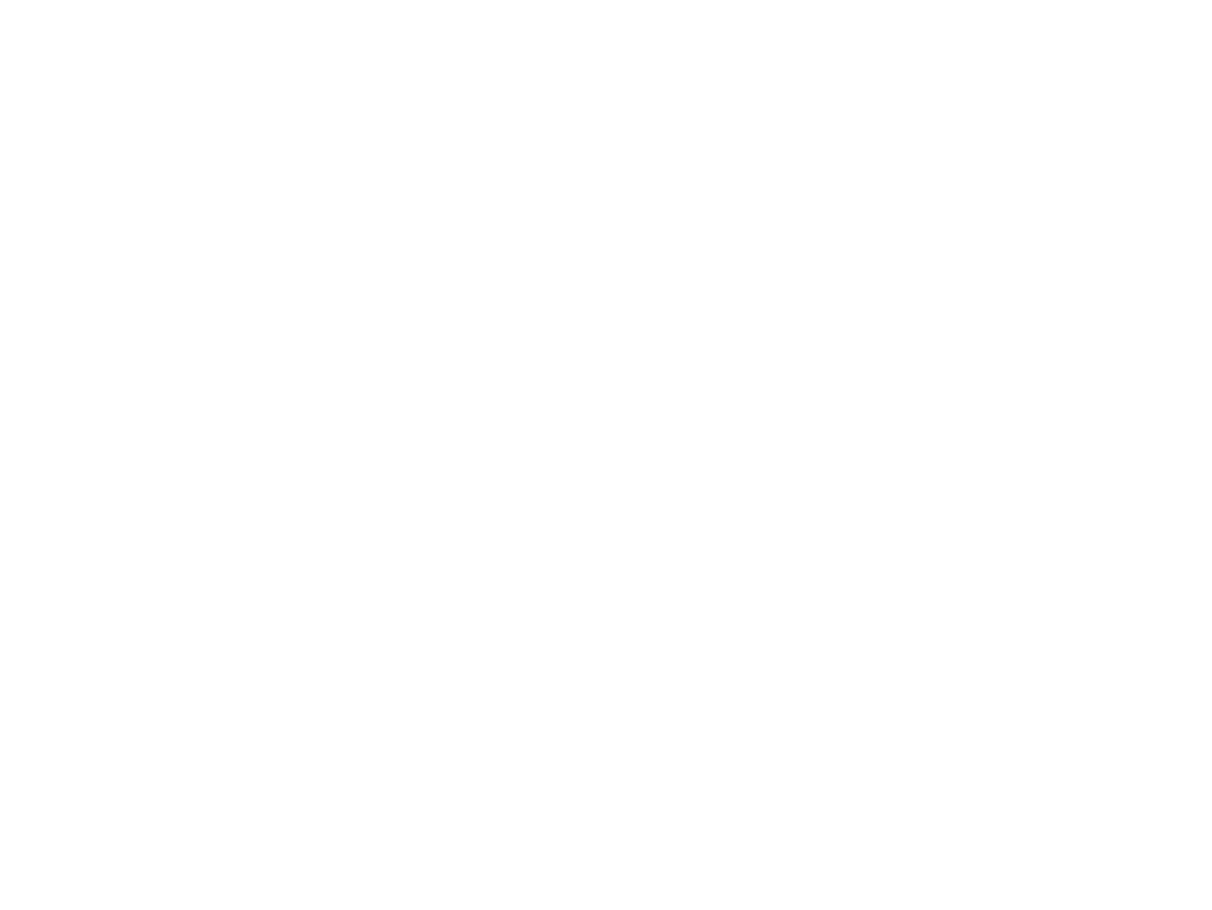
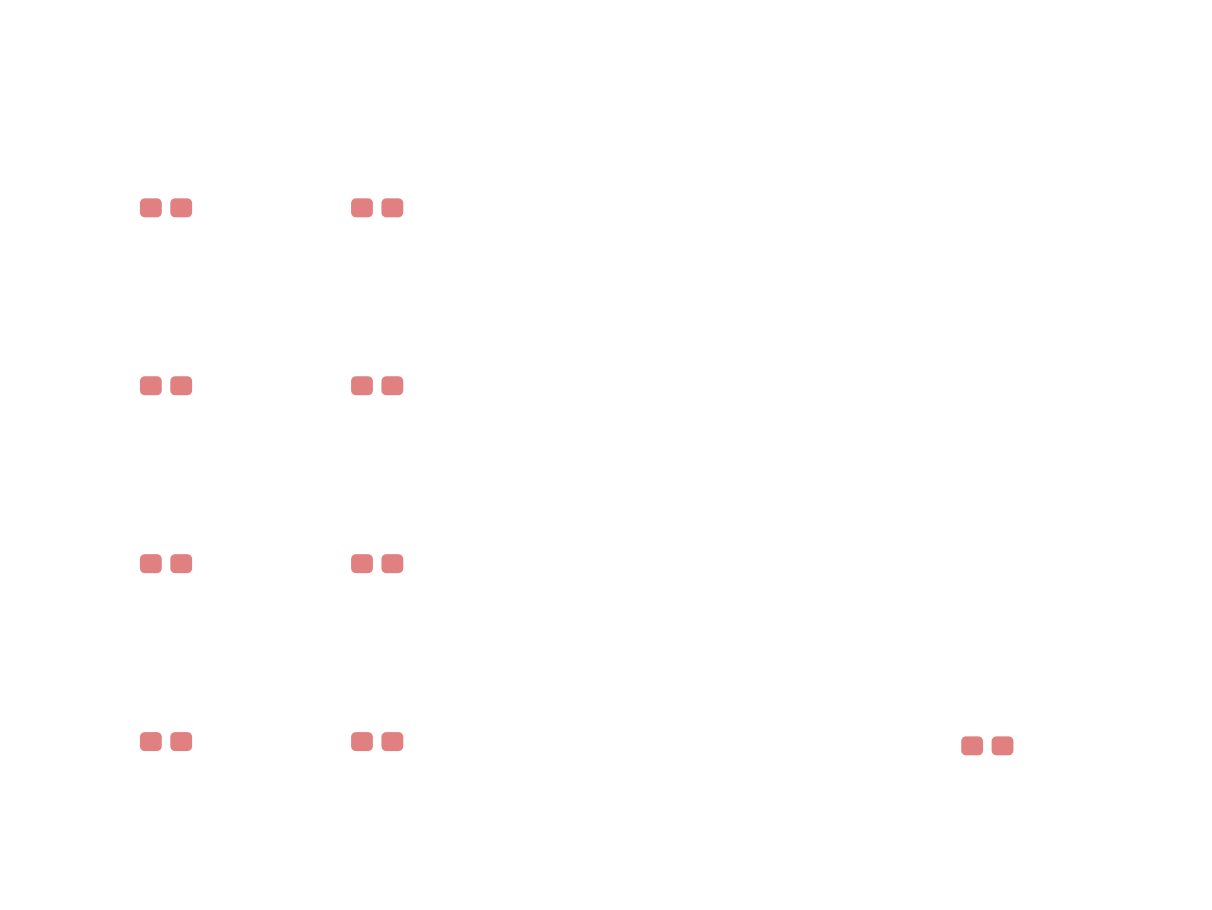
part: none -> (166, 207)
part: none -> (377, 207)
part: none -> (166, 385)
part: none -> (377, 385)
part: none -> (166, 563)
part: none -> (377, 563)
part: none -> (166, 741)
part: none -> (377, 741)
part: none -> (987, 745)

